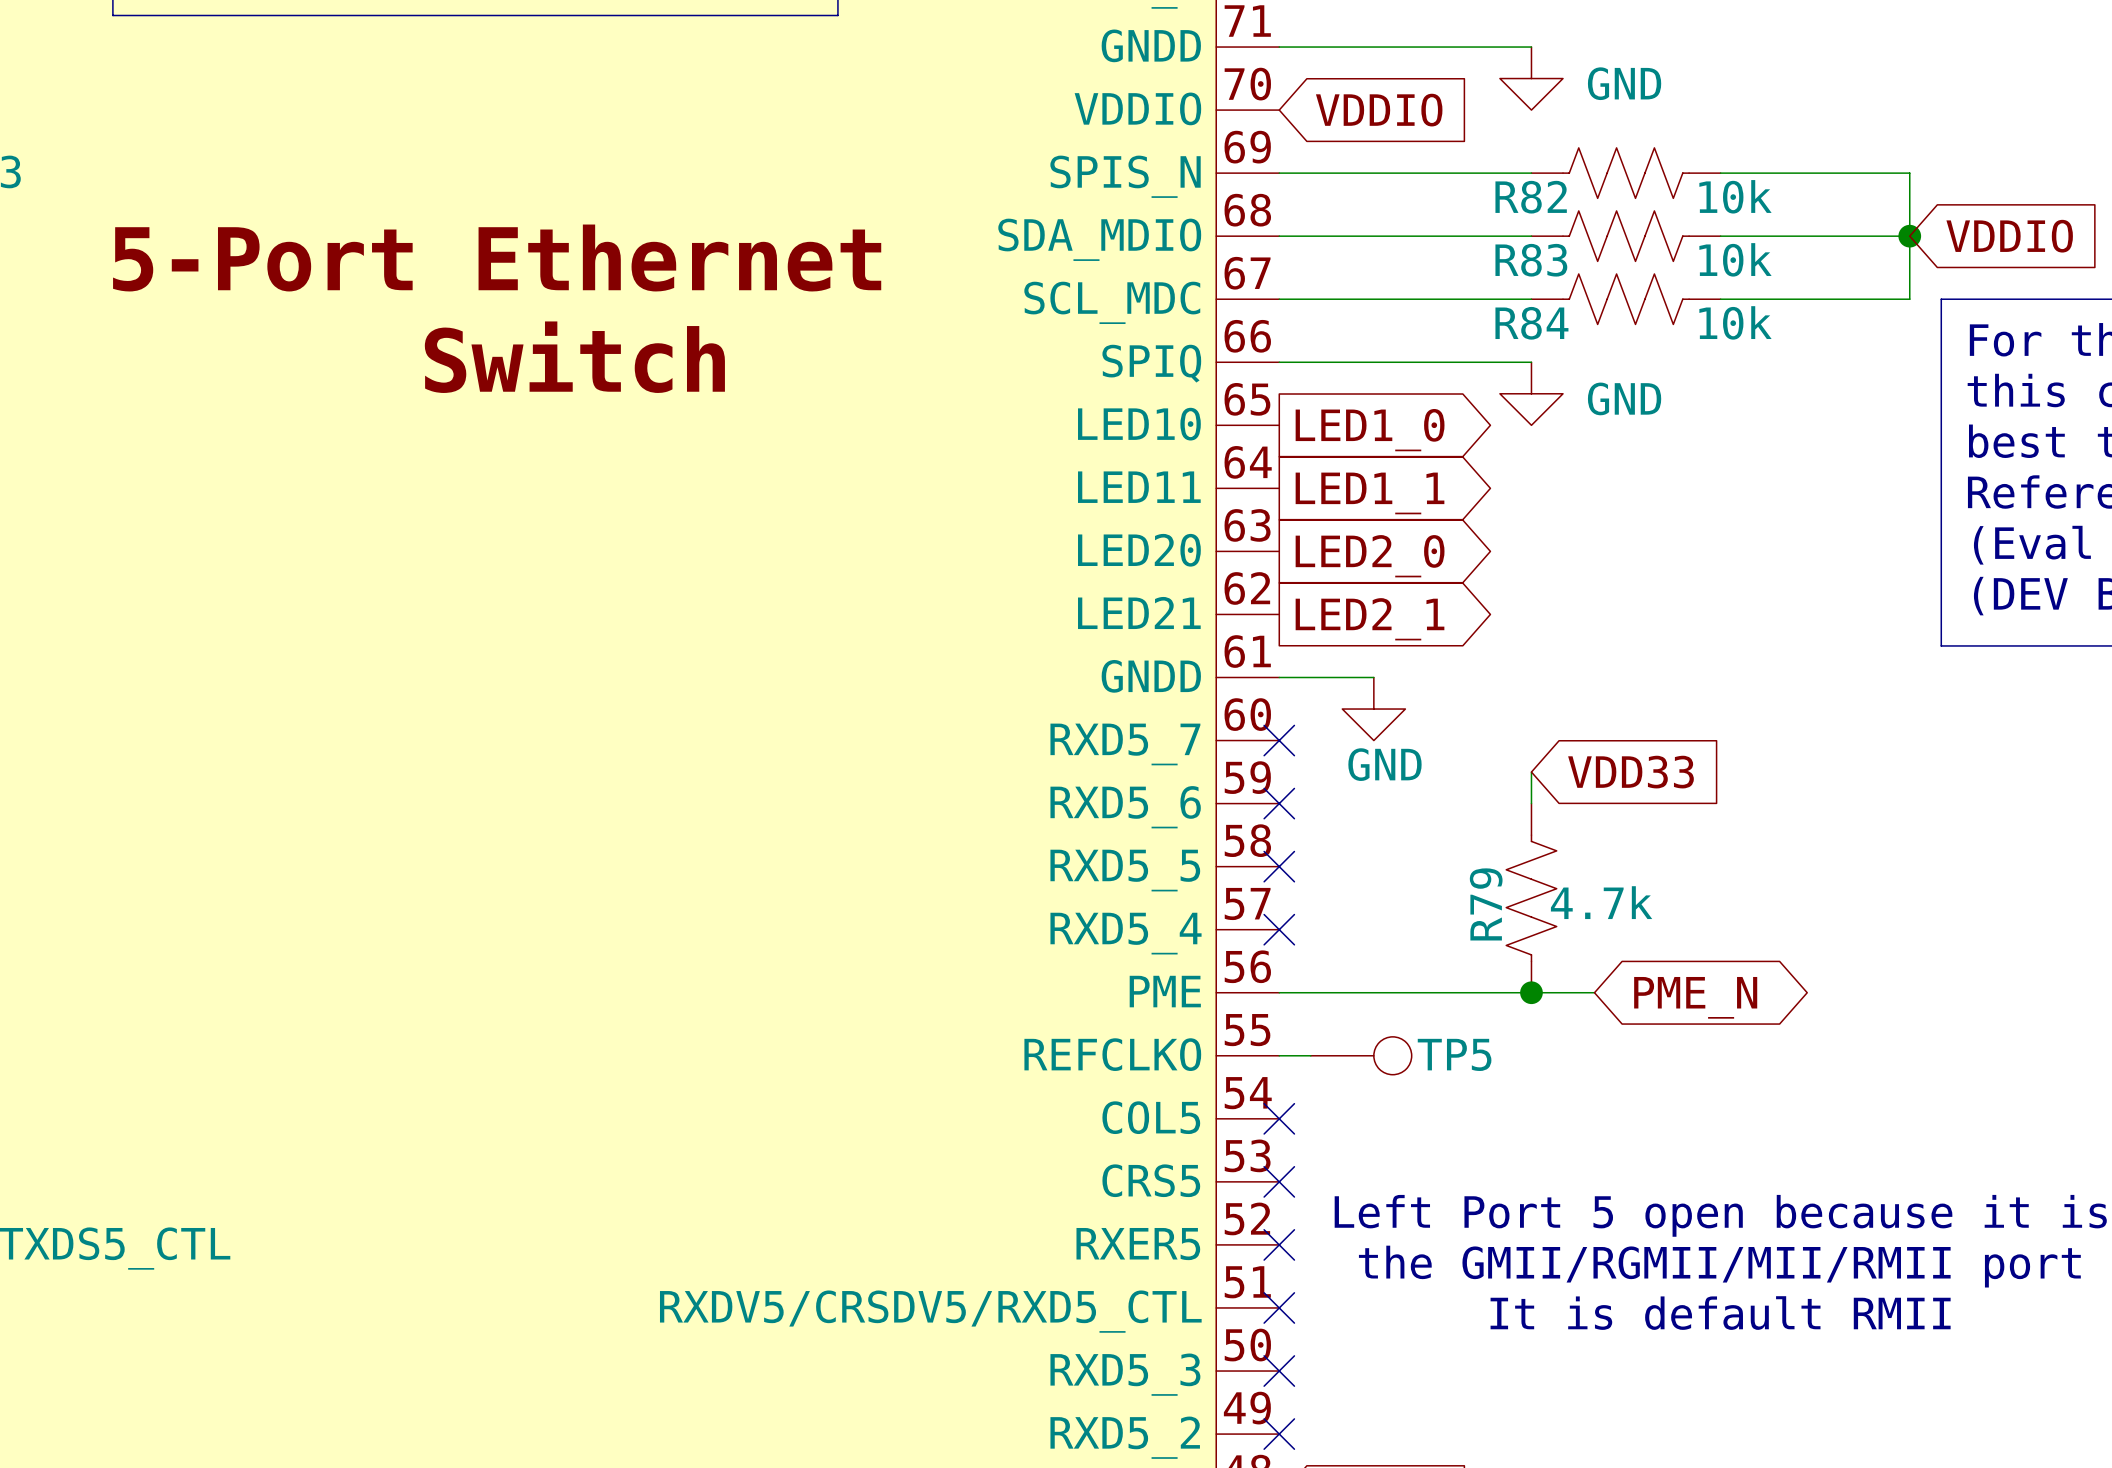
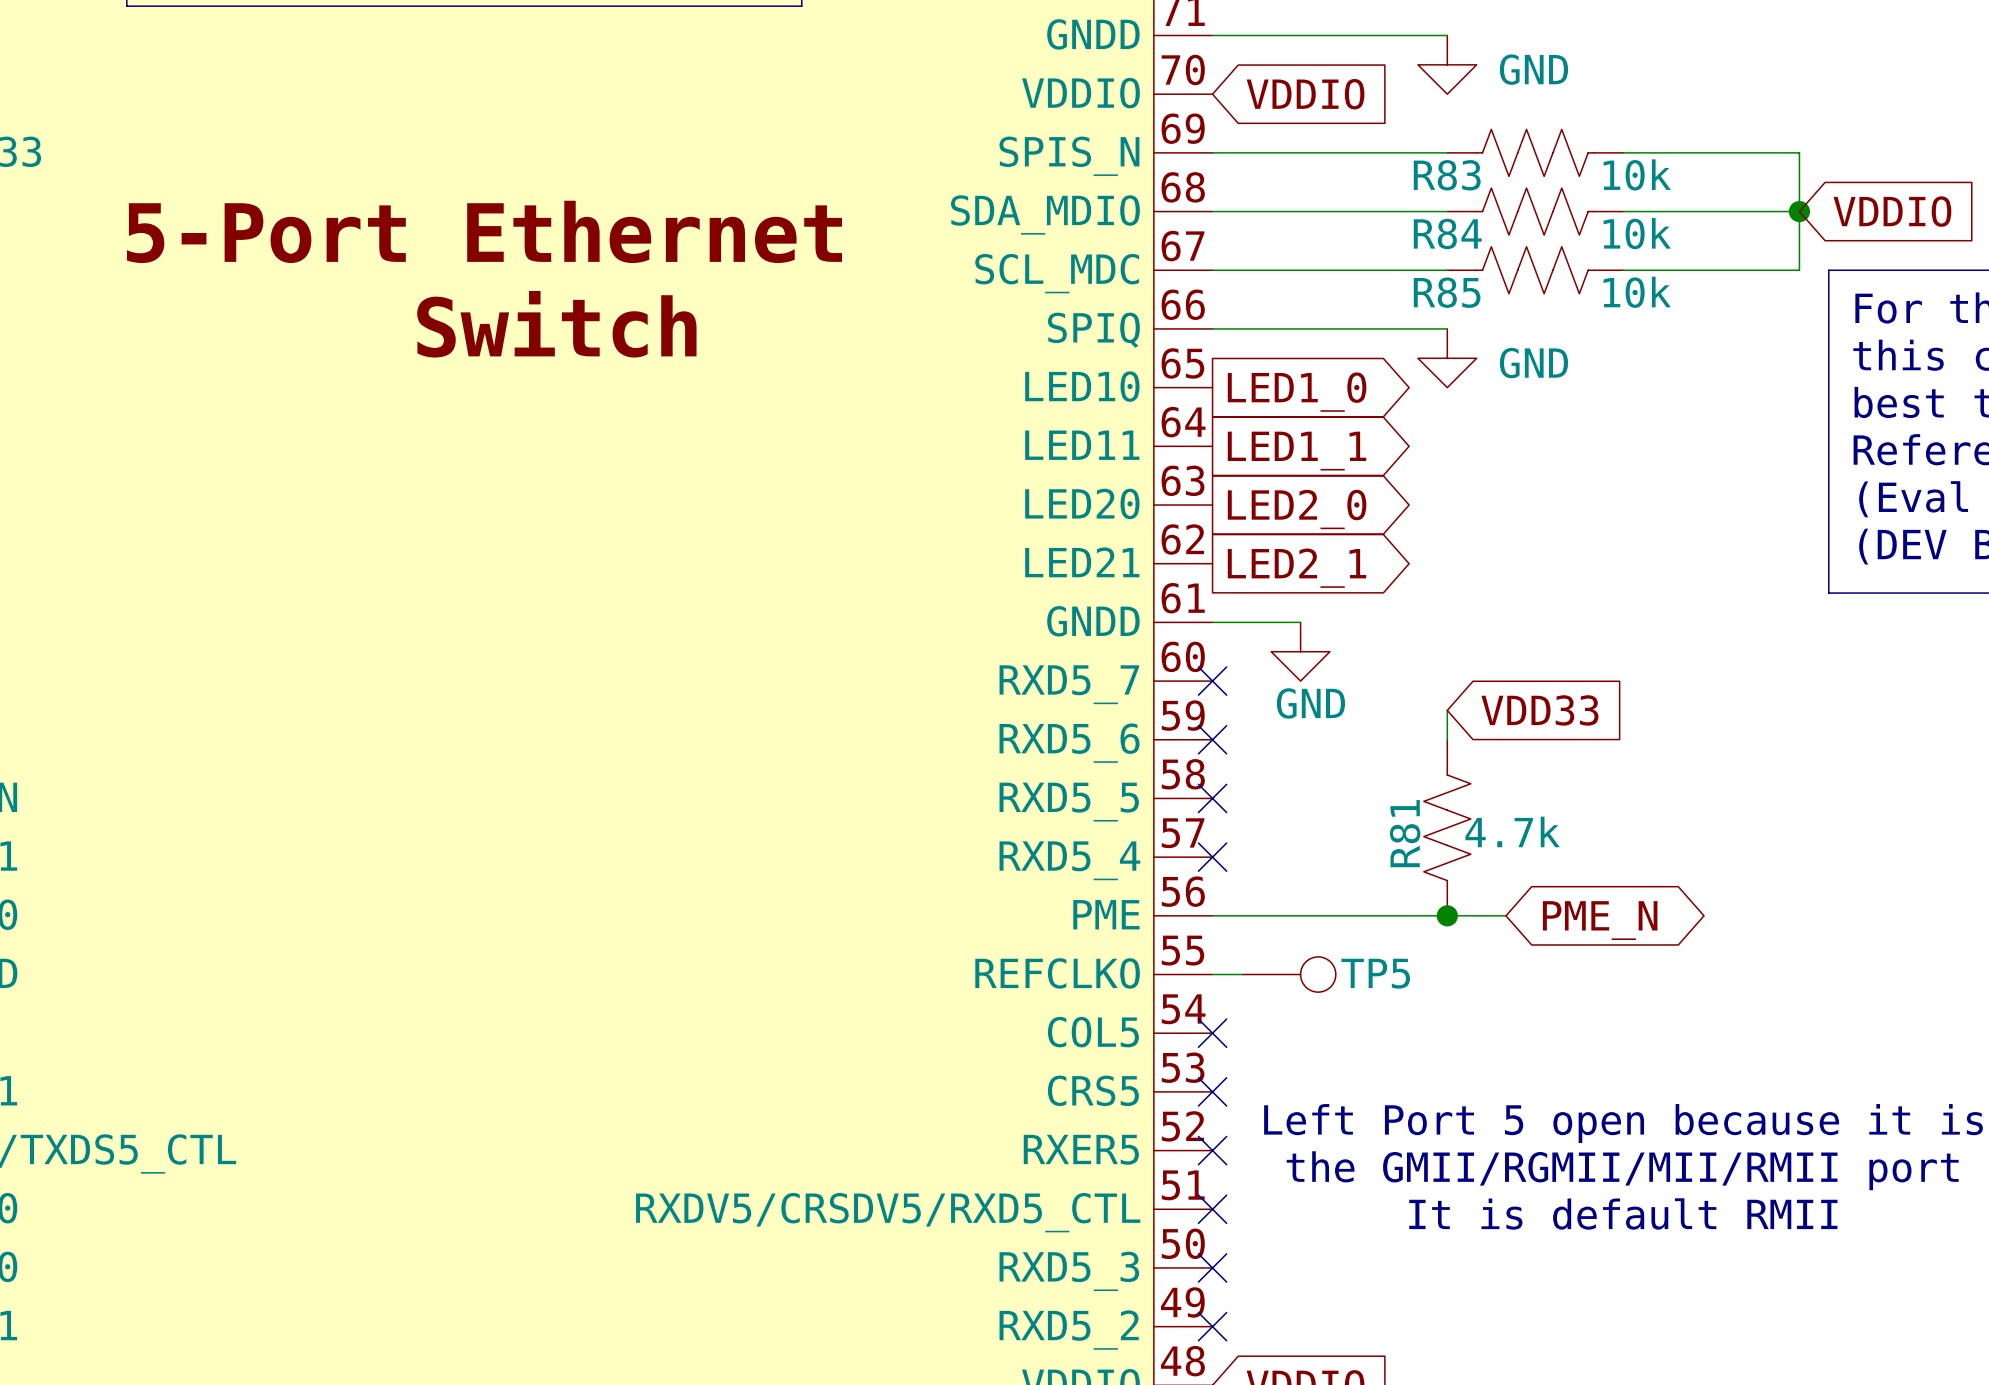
R82 name: R82 (1531, 197) -> R83 (1447, 175)
R83 name: R83 (1531, 260) -> R84 (1447, 233)
R84 name: R84 (1531, 323) -> R85 (1447, 292)
R79 name: R79 (1486, 904) -> R81 (1405, 833)

